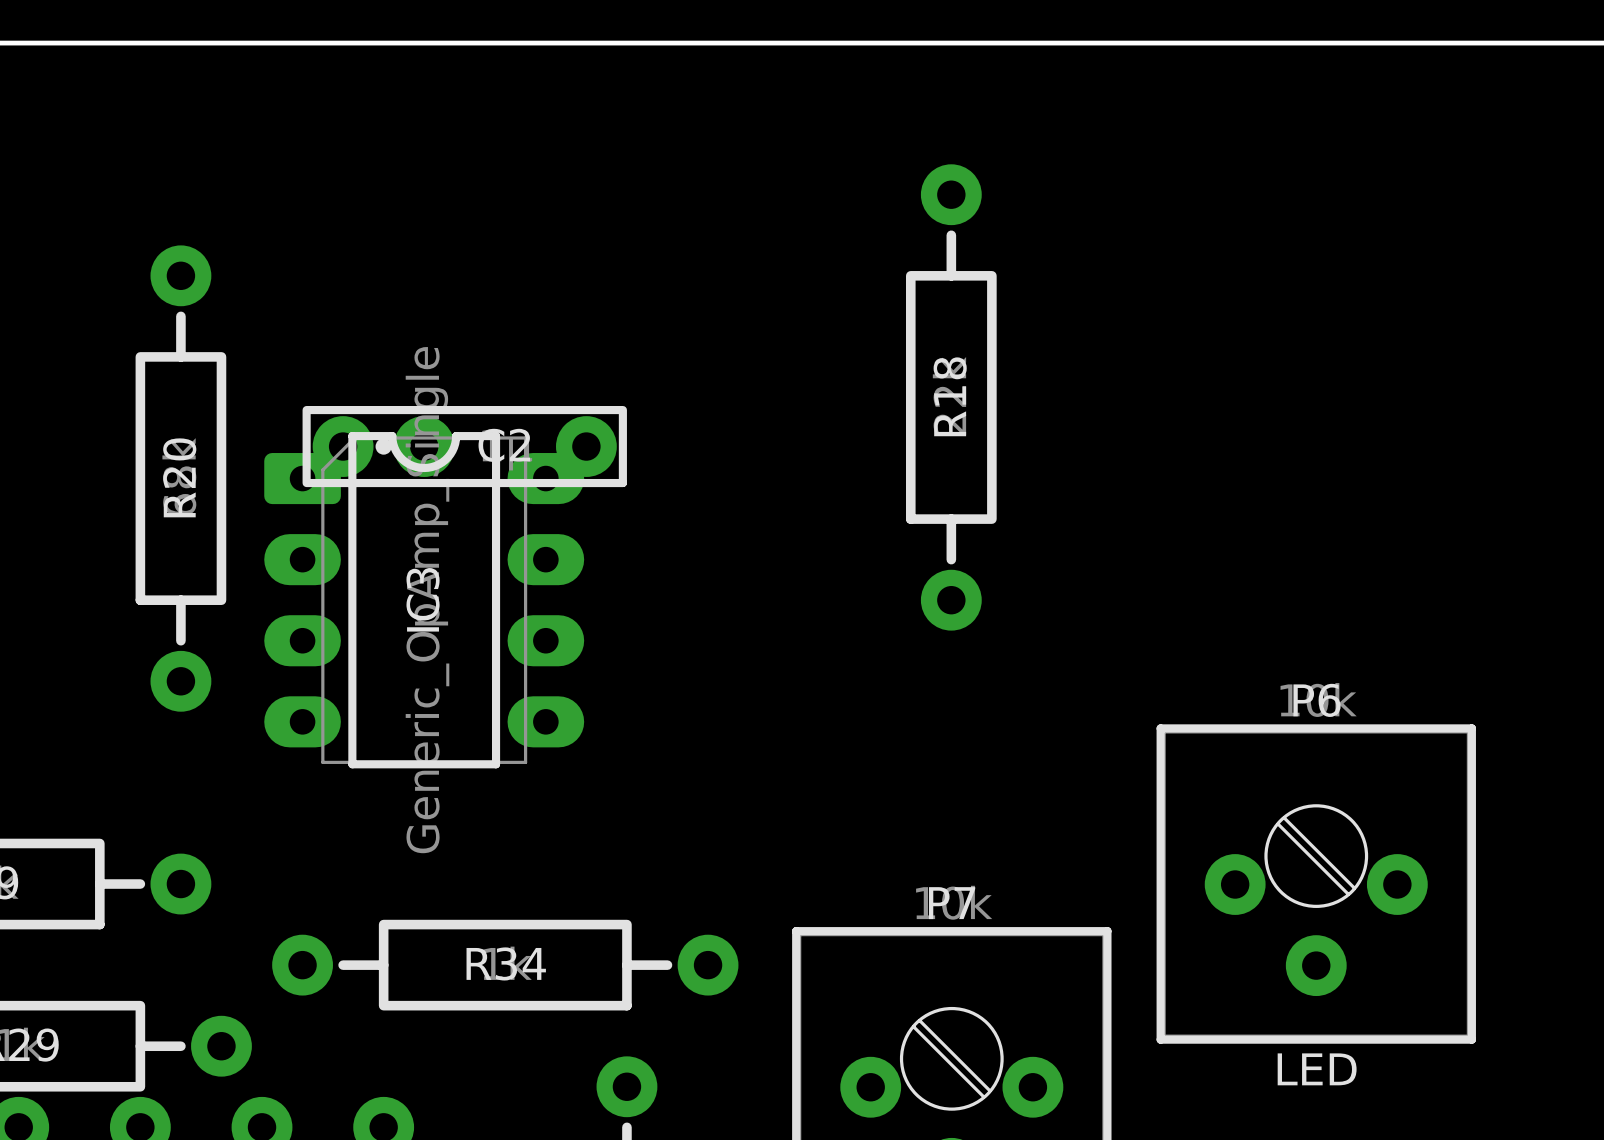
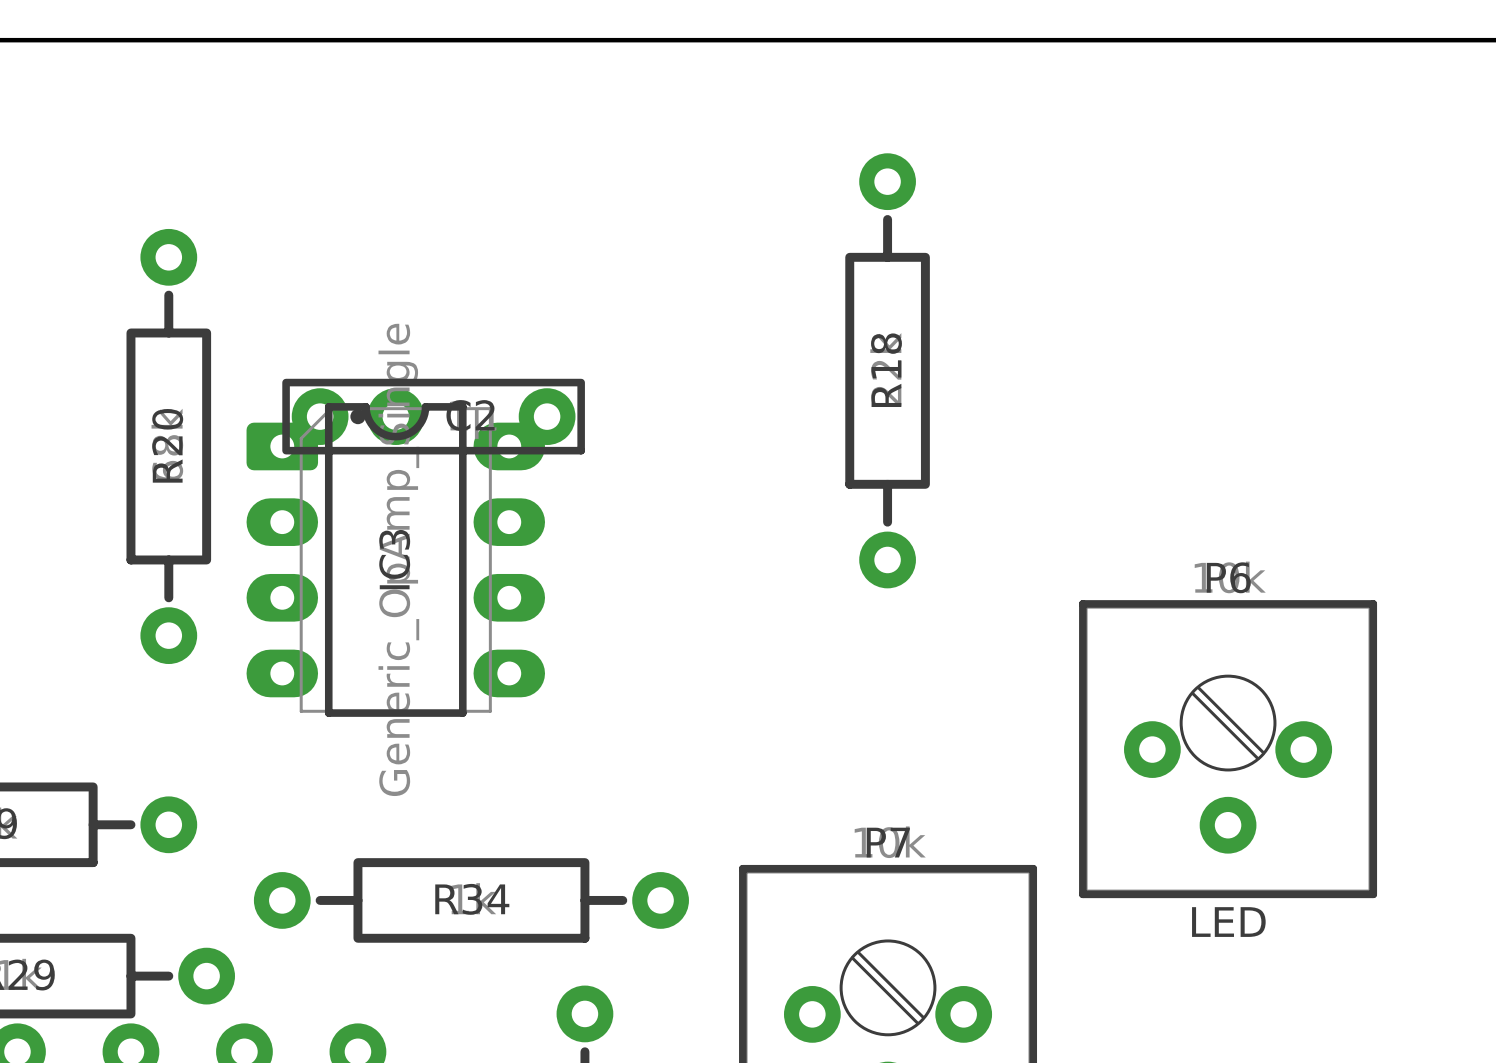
P6 position: (1316, 884) -> (1228, 749)

